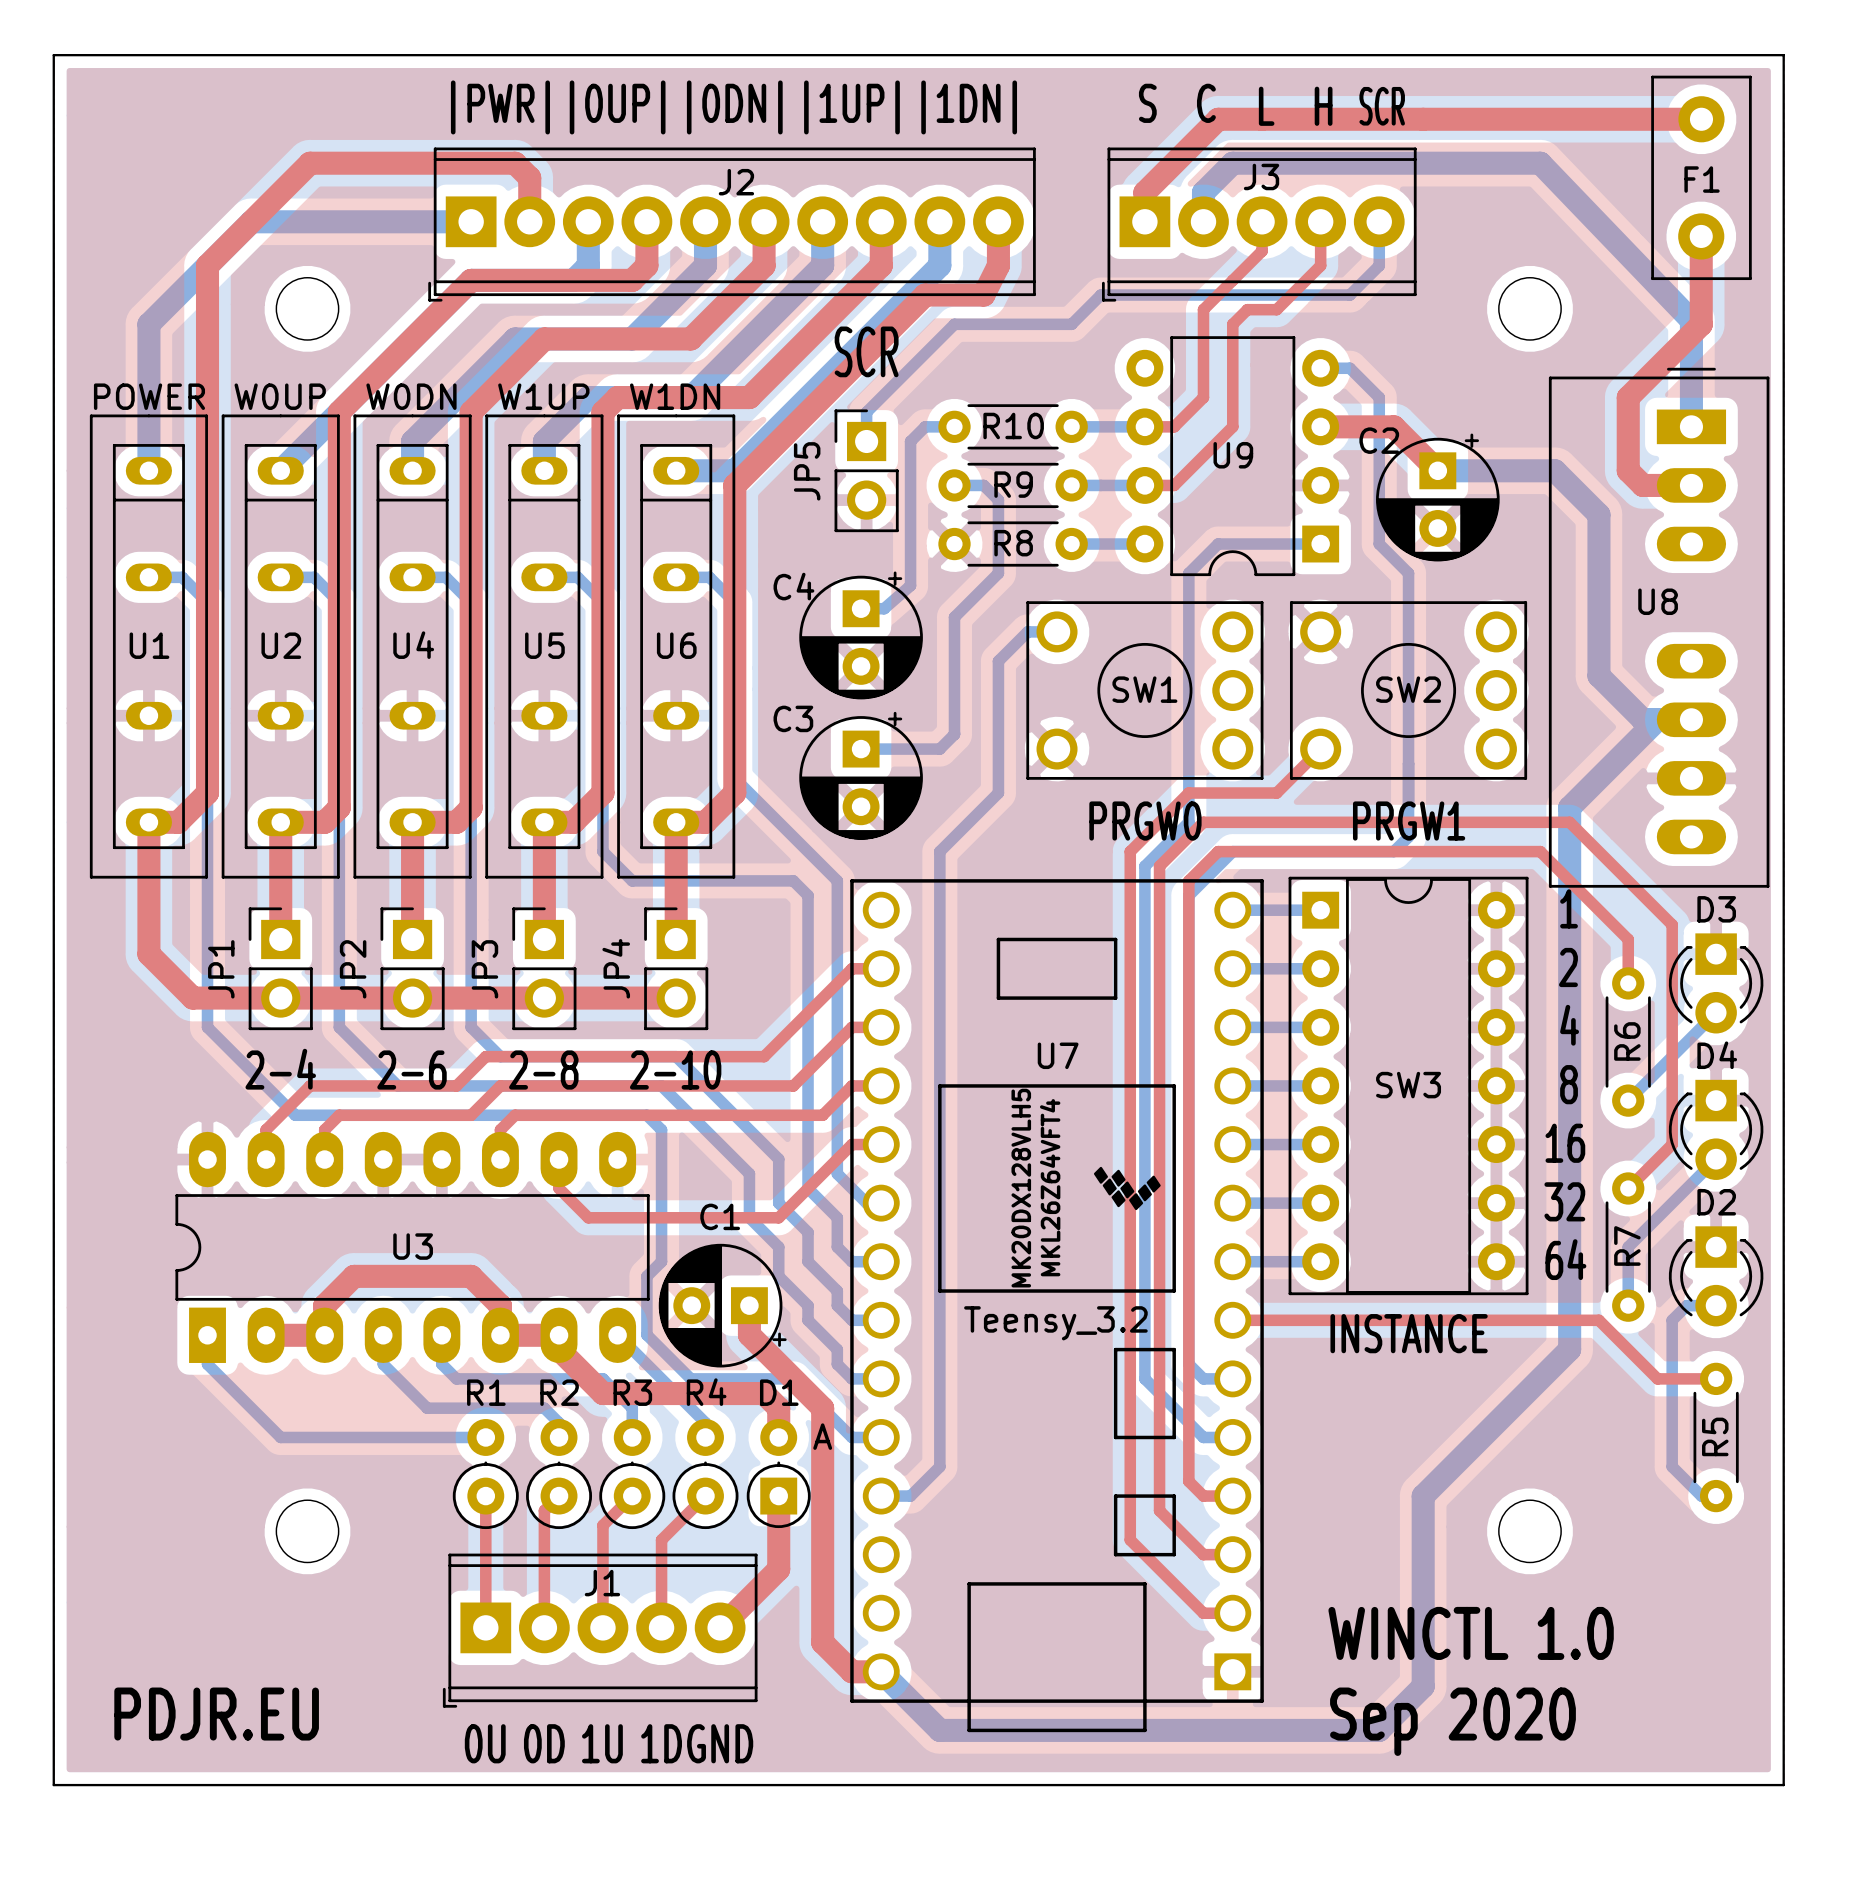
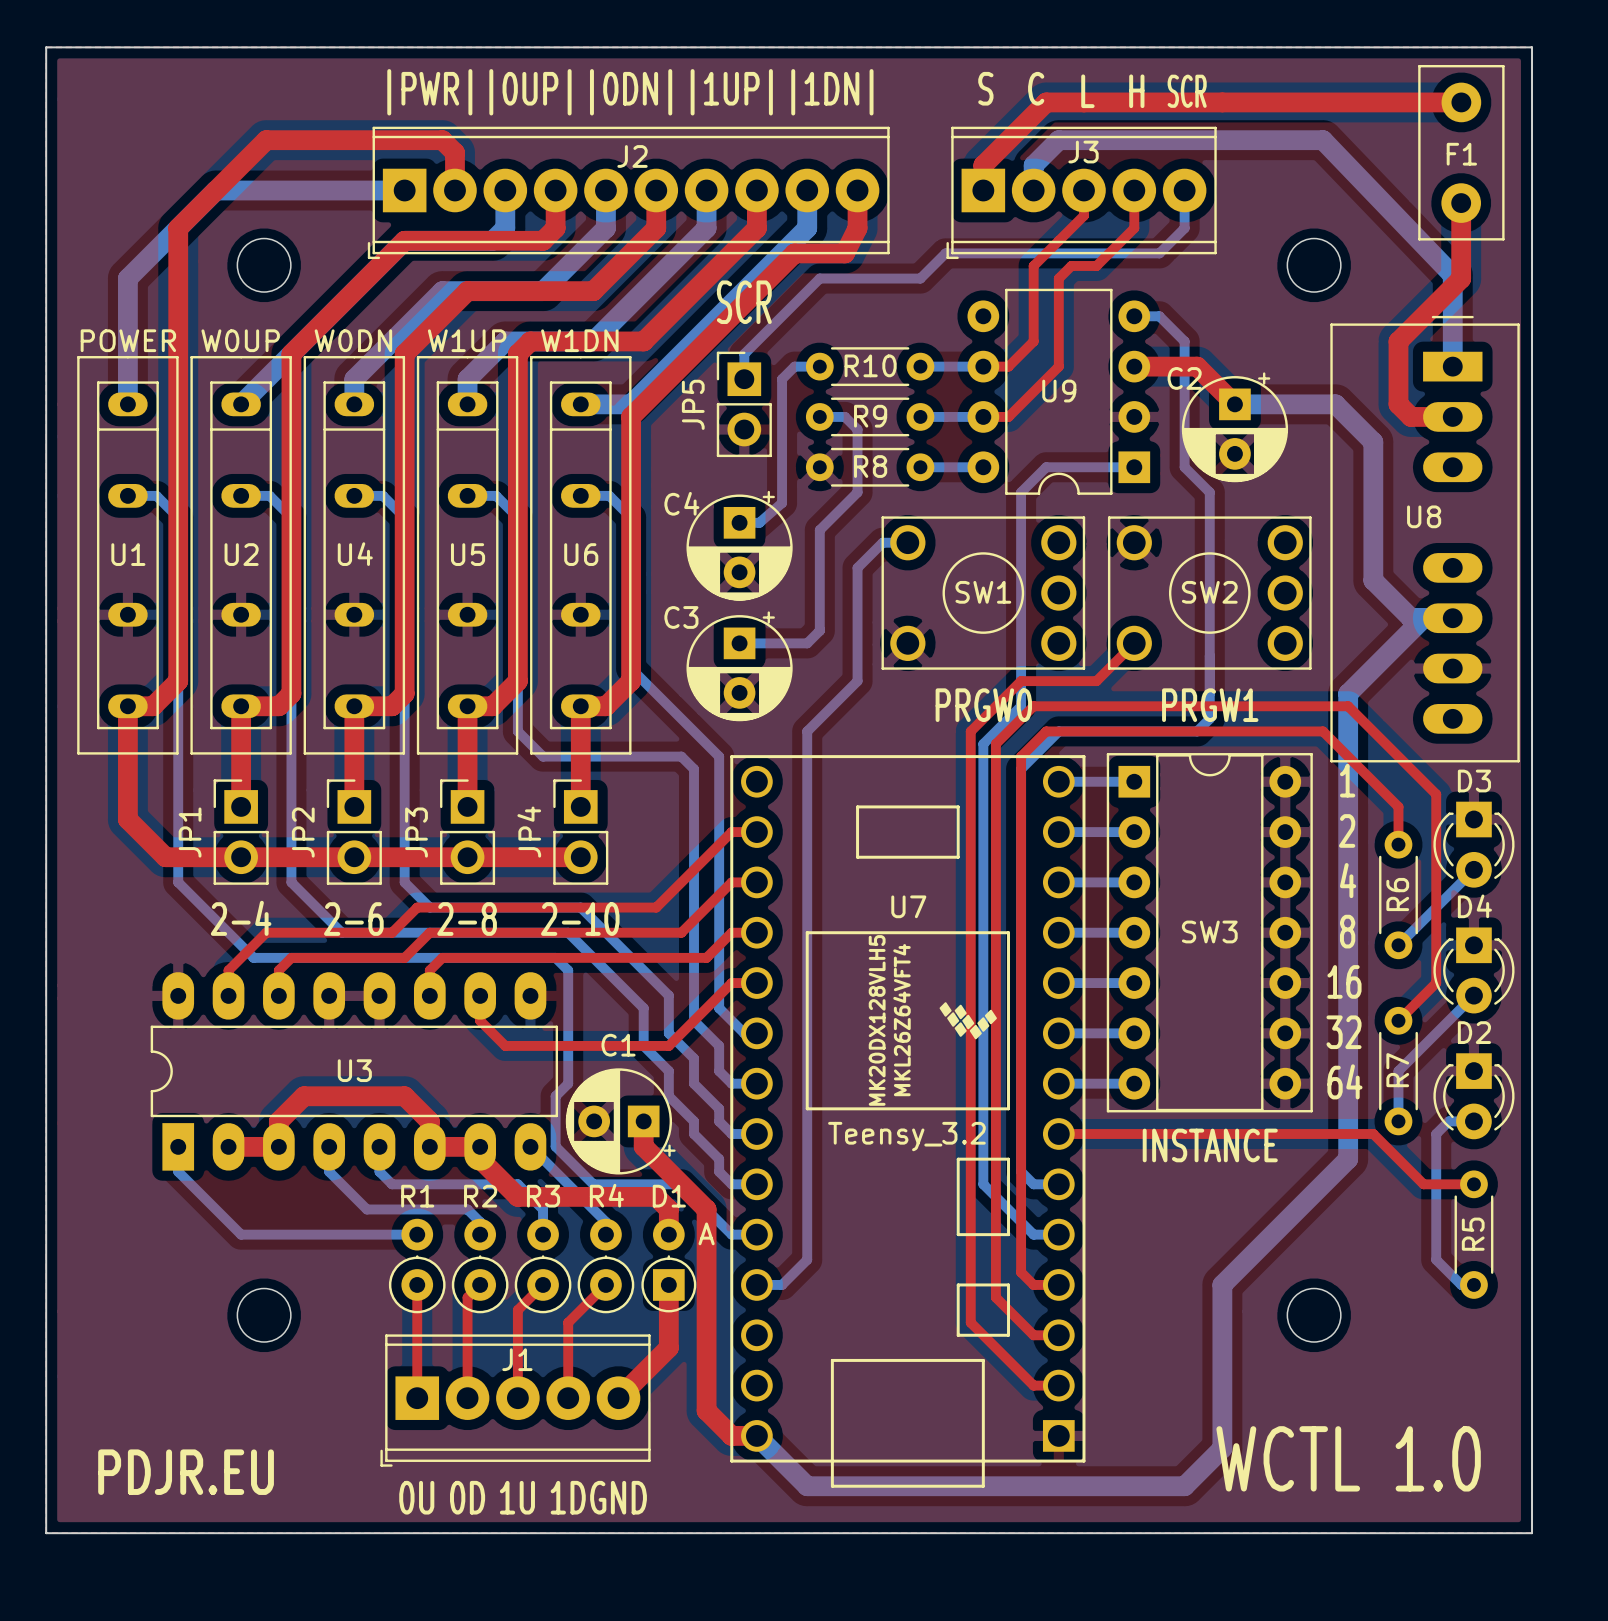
text: WINCTL 1.0 (1471, 1633) -> WCTL 1.0 (1348, 1458)
text: Sep 2020 (1452, 1721) -> none

